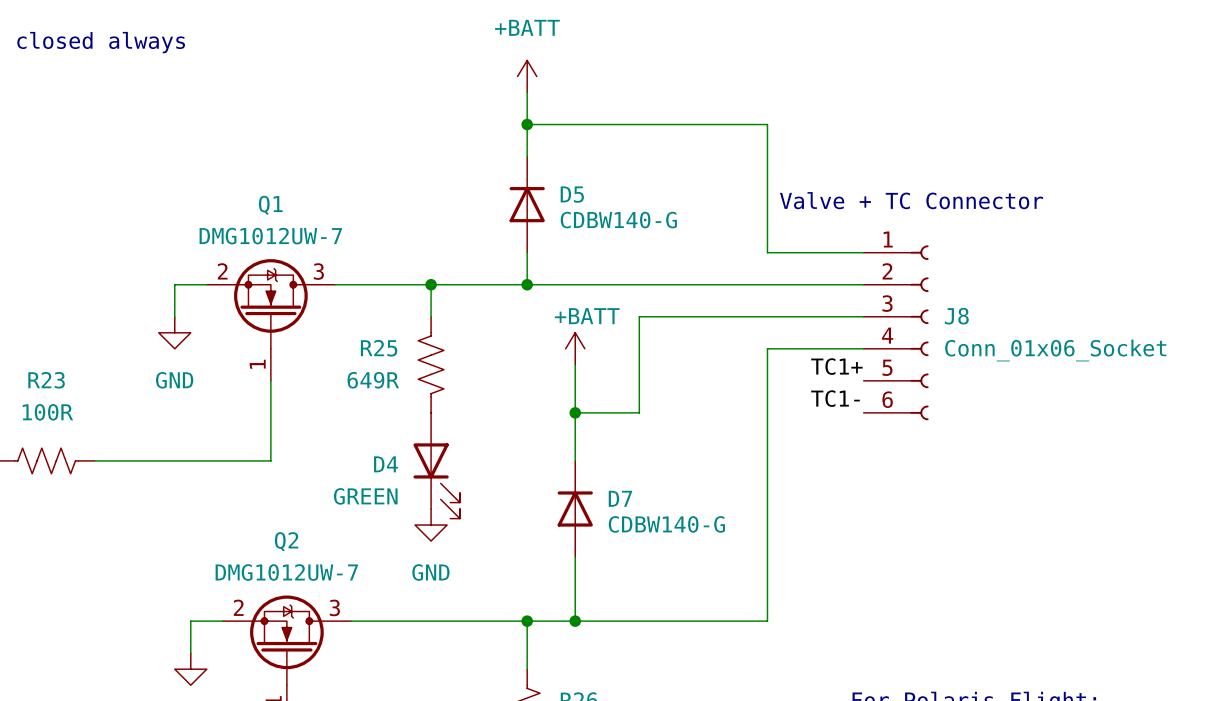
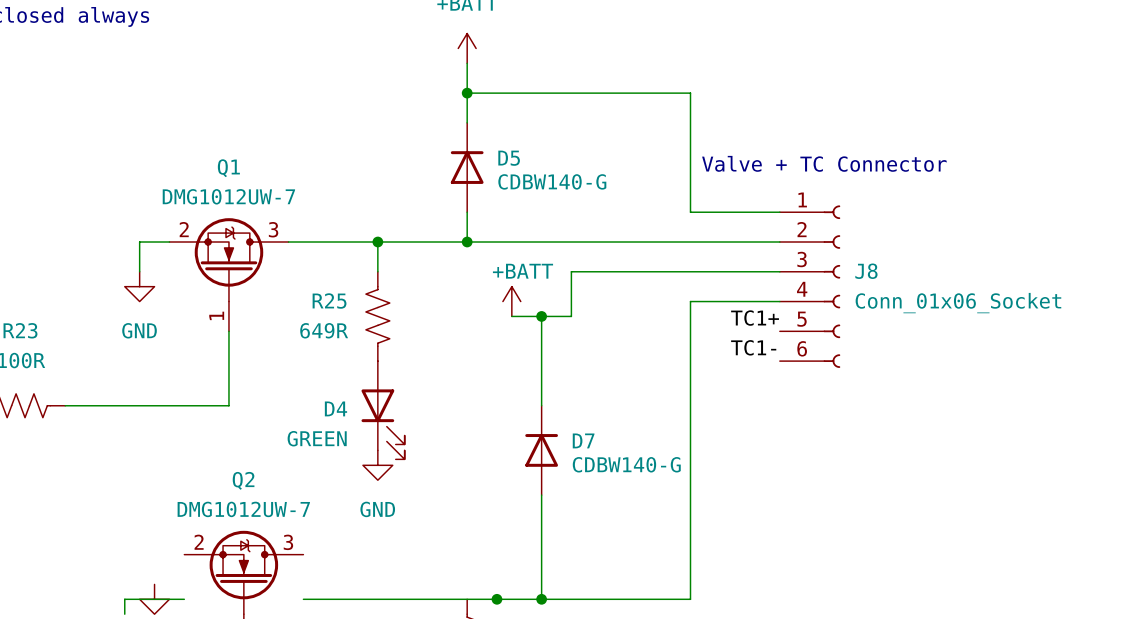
wire: (575, 364) (575, 460) -> (541, 316) (541, 405)
wire: (639, 364) (639, 412) (575, 412) -> (571, 316) (511, 316)
junction position: (575, 412) -> (541, 316)
D7 position: (575, 509) -> (541, 450)
wire: (575, 557) (575, 621) -> none
wire: none -> (541, 495) (541, 599)
wire: (222, 621) (190, 621) (190, 653) -> none
wire: (350, 621) (767, 621) -> (303, 599) (690, 599) (690, 554)
wire: (527, 621) (527, 669) -> none
junction: (527, 621) -> none
junction: (575, 621) -> none
wire: none -> (184, 599) (124, 599) (124, 614)
junction: none -> (496, 599)
junction: none -> (541, 599)

